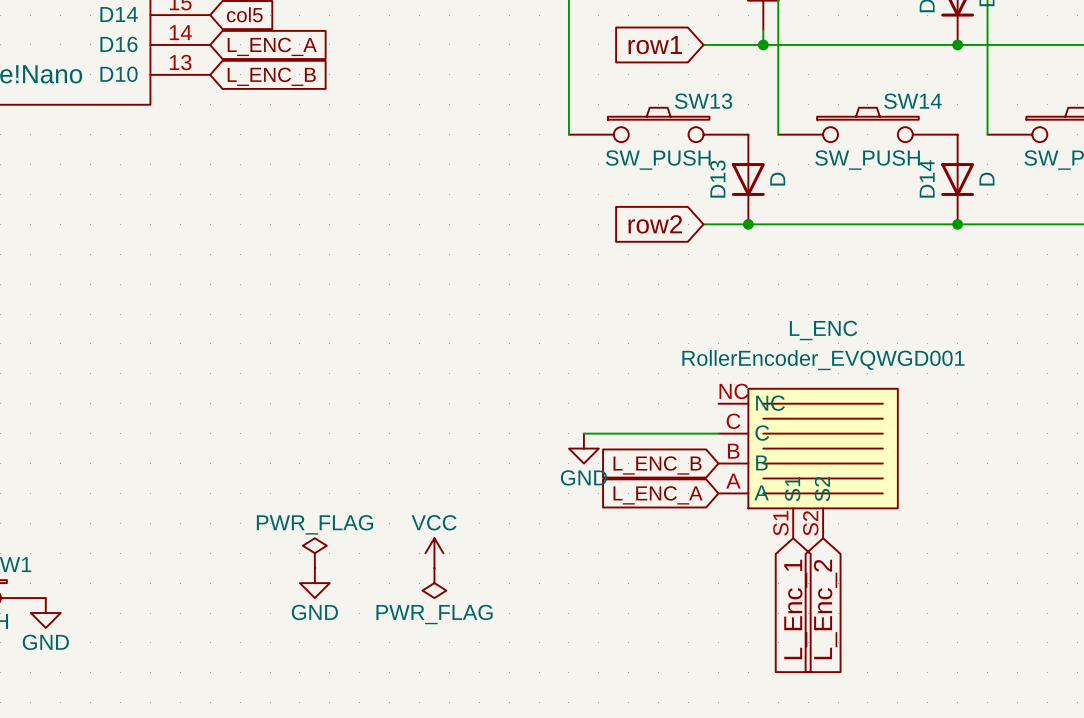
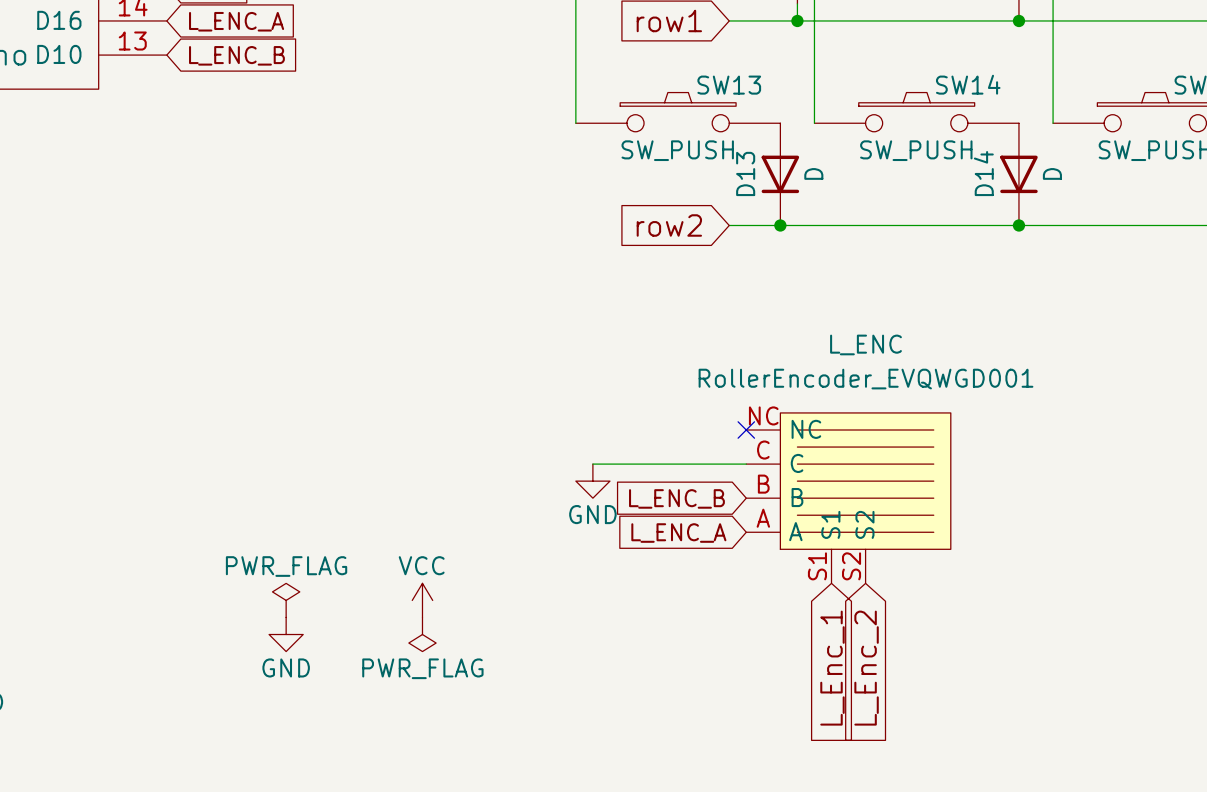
no-connect mark: none -> (746, 430)

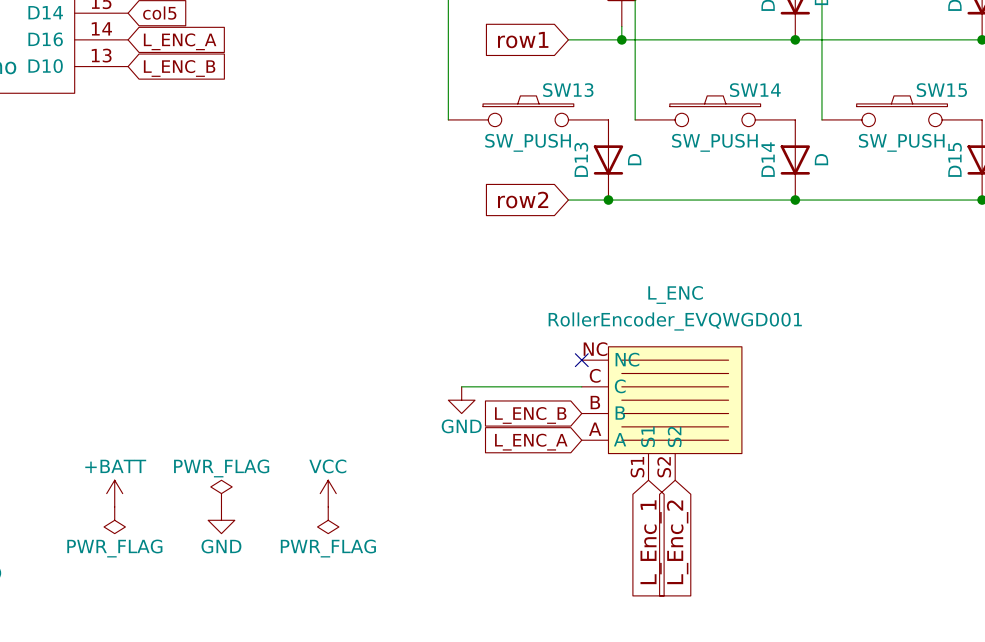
power symbol: none -> +BATT (114, 493)
power symbol: none -> PWR_FLAG (114, 520)

